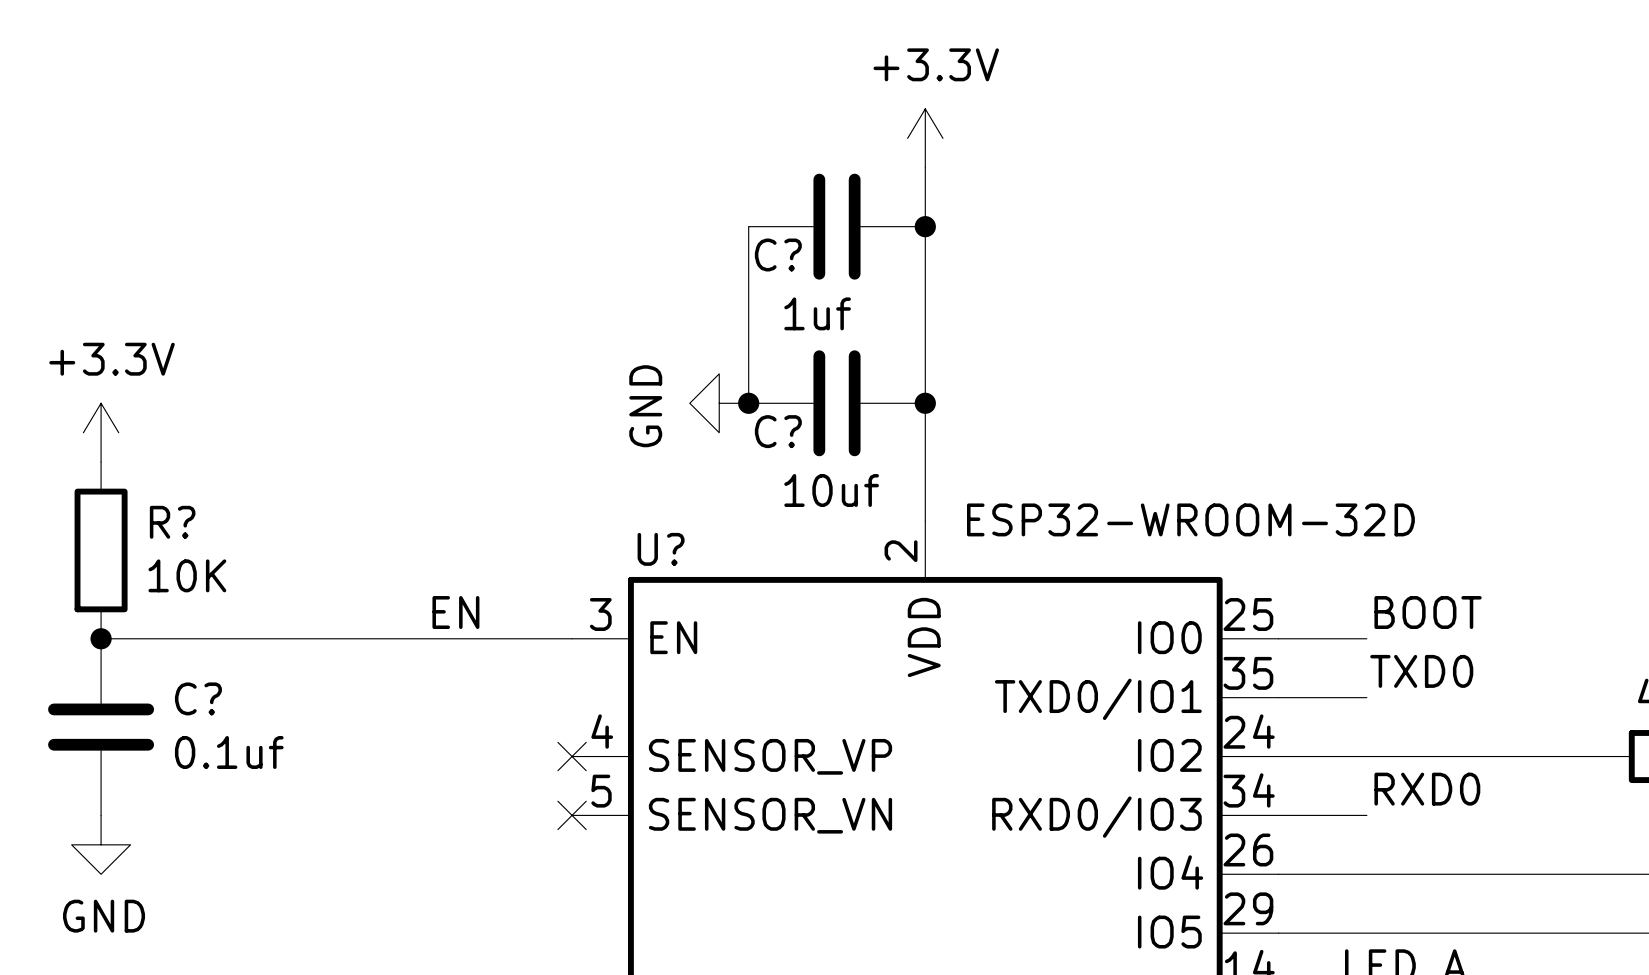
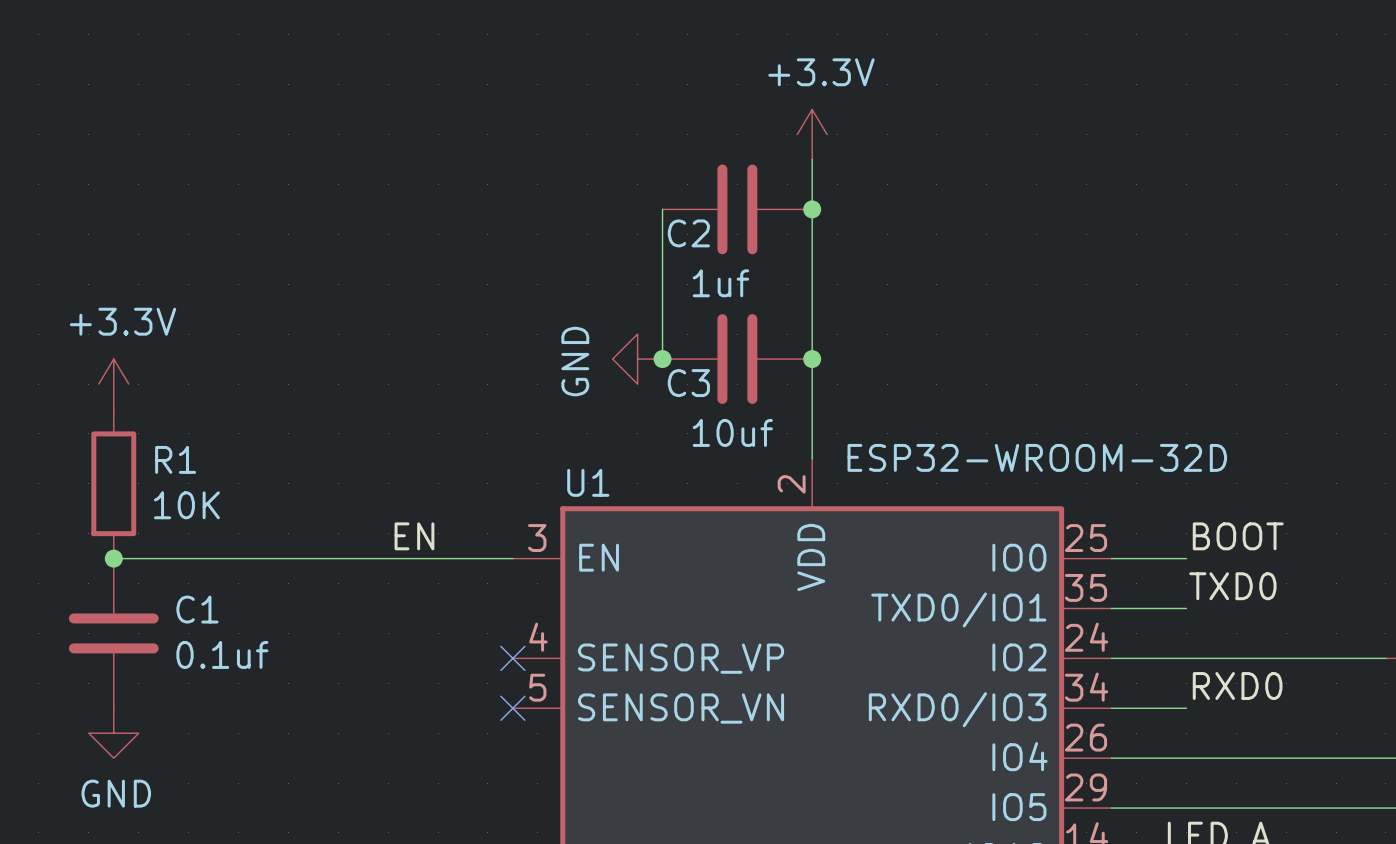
C? name: C? (778, 255) -> C2 (688, 233)
C? name: C? (778, 431) -> C3 (688, 383)
R? name: R? (172, 522) -> R1 (175, 459)
U? name: U? (661, 549) -> U1 (588, 482)
C? name: C? (198, 698) -> C1 (197, 609)

